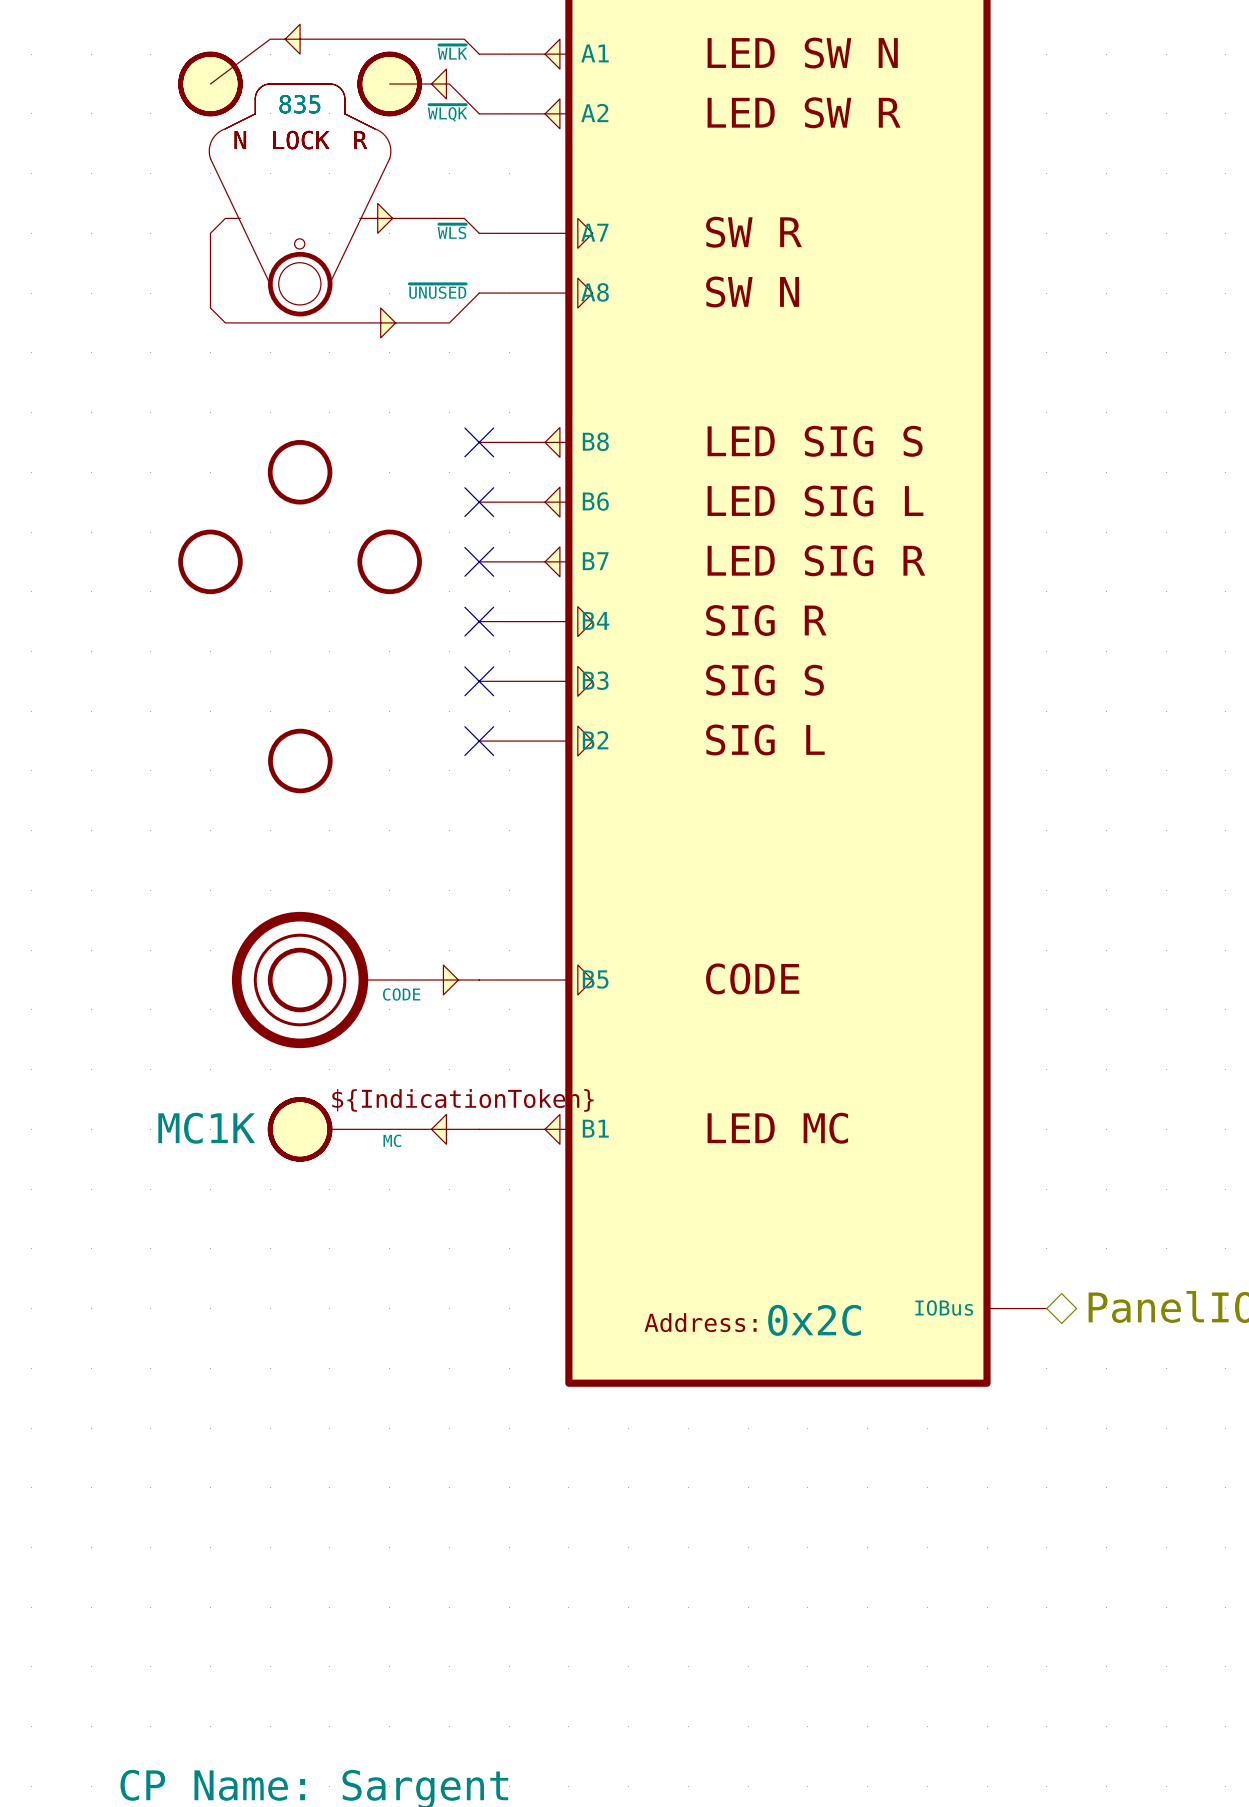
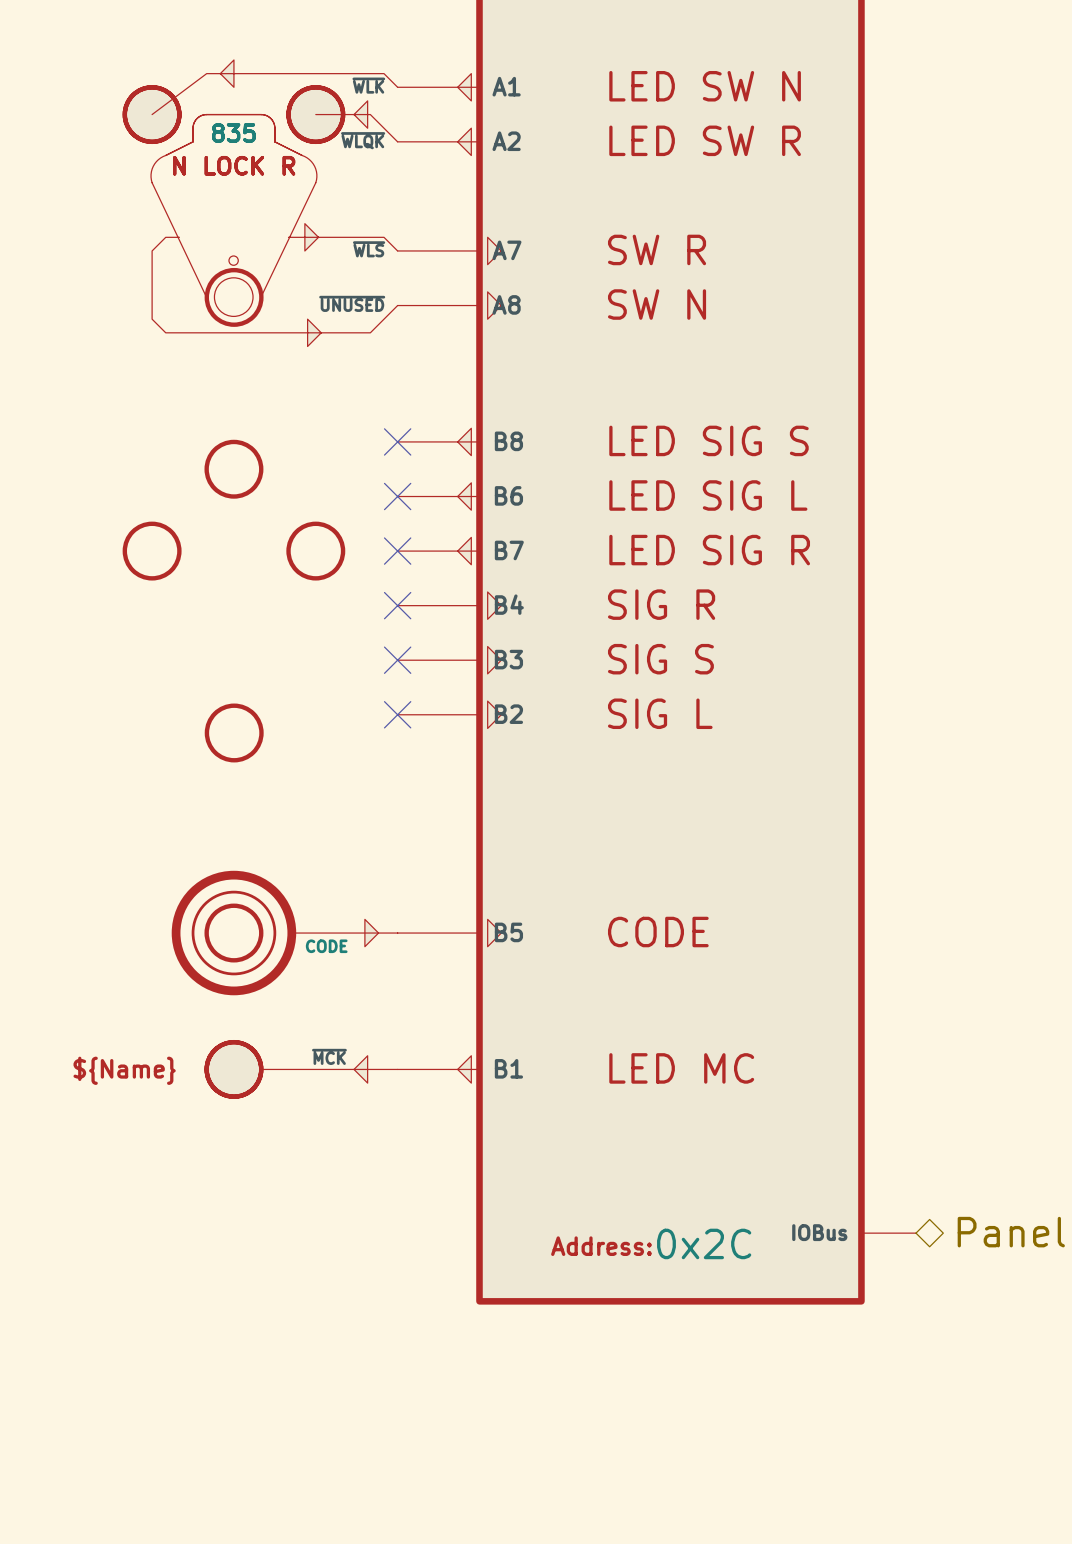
part text: ${IndicationToken} (462, 1100) -> none
part pin name: none -> ~{MCK} (329, 1056)
part text: MC1K (206, 1128) -> none
part text: none -> ${Name} (124, 1070)
part value: MC (392, 1140) -> none

